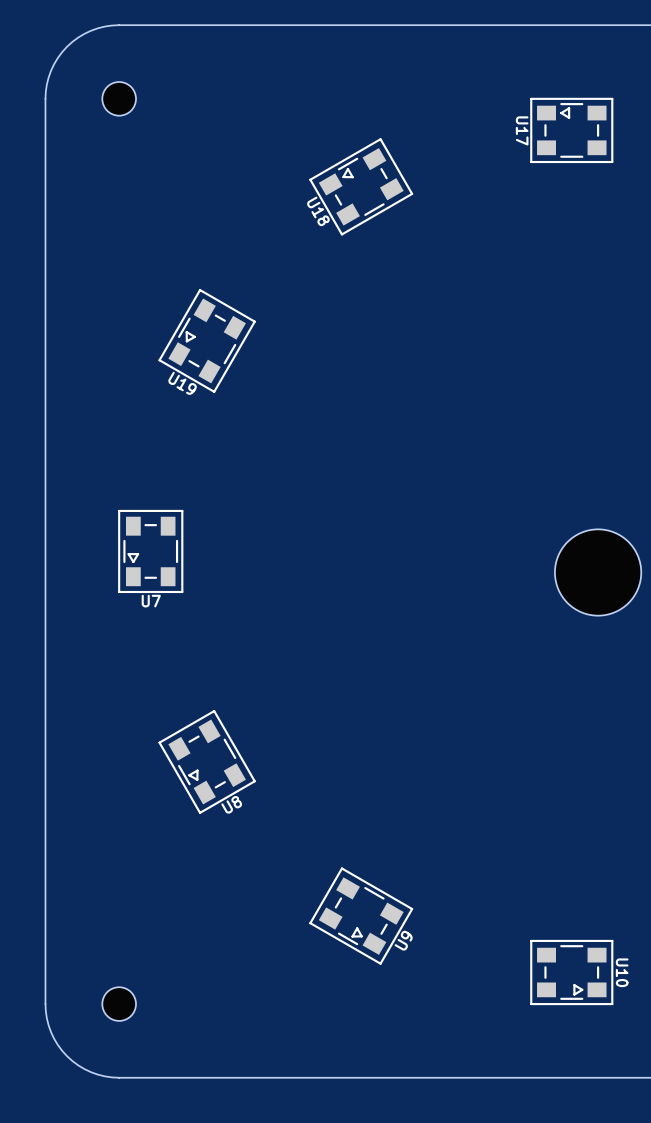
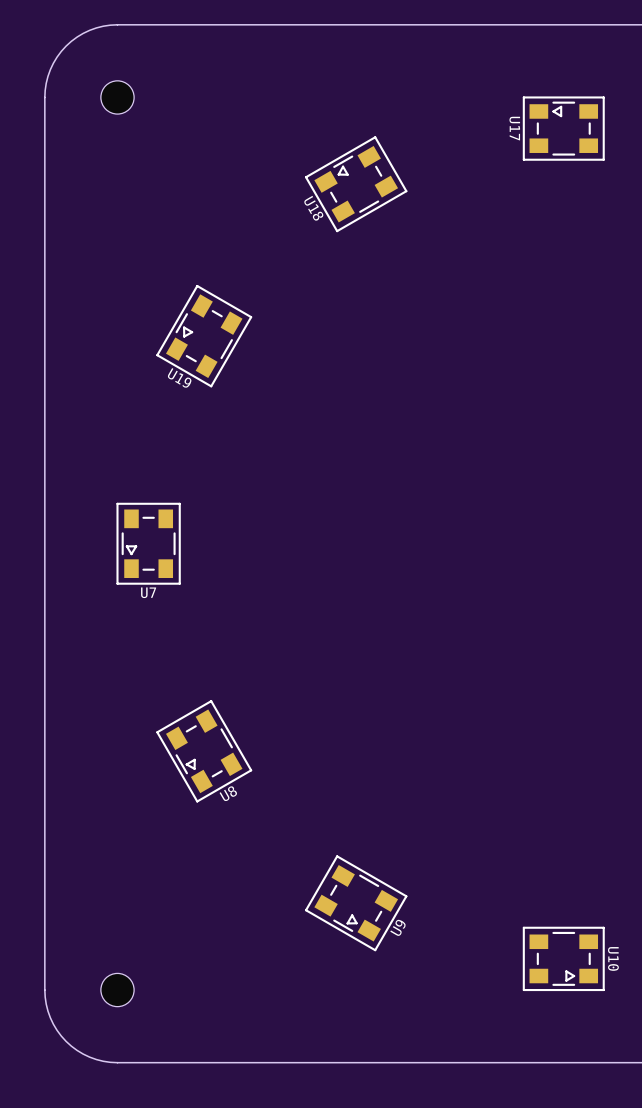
part: (598, 572) -> none

